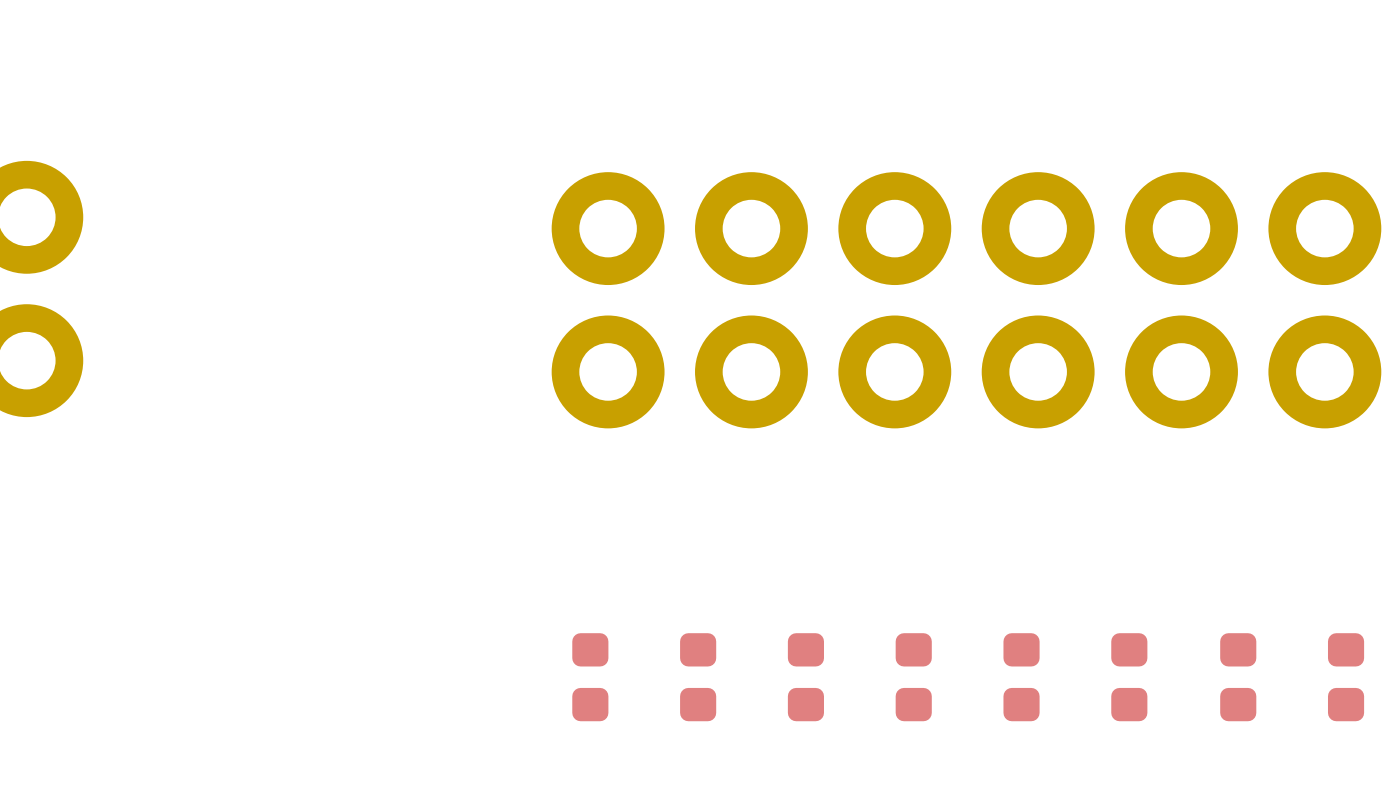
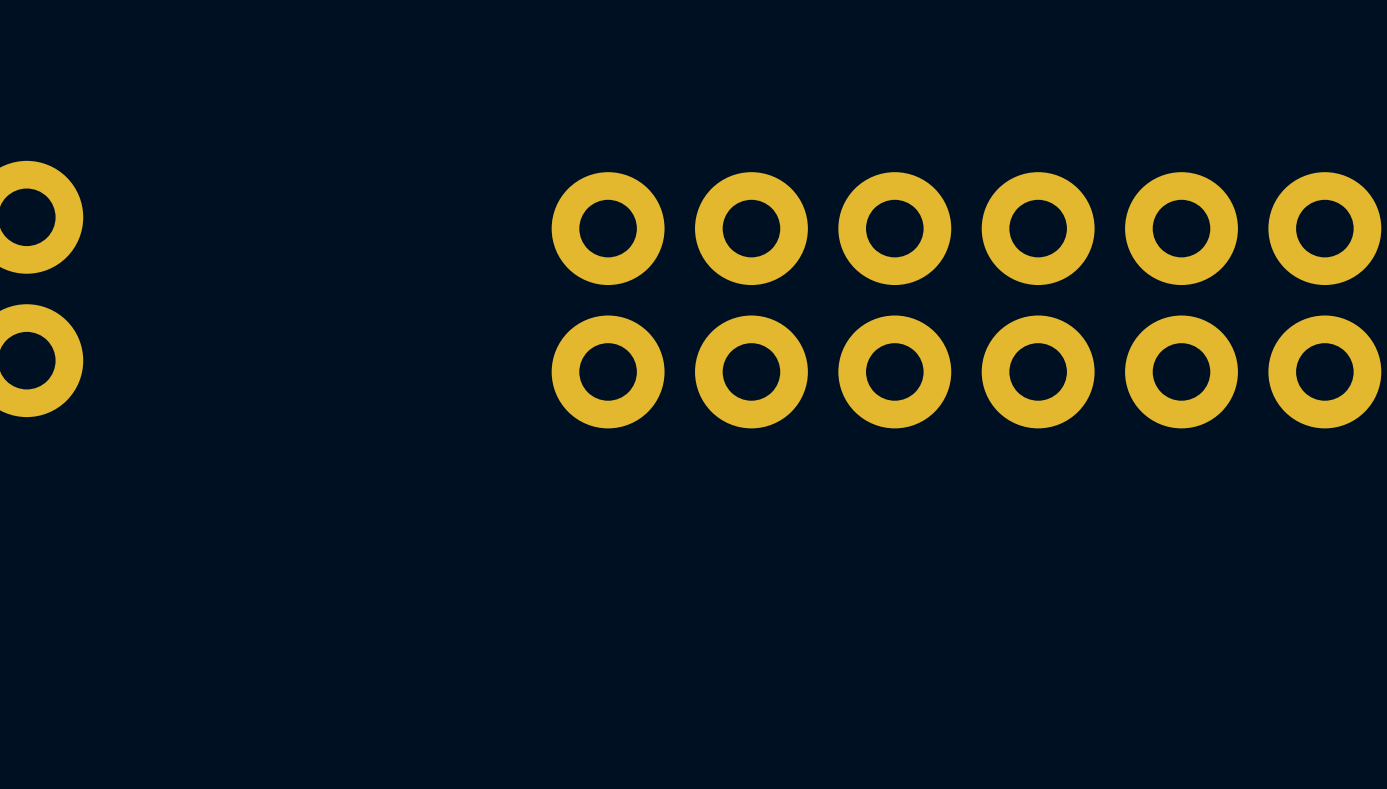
part: (590, 677) -> none
part: (698, 677) -> none
part: (805, 677) -> none
part: (913, 677) -> none
part: (1021, 677) -> none
part: (1129, 677) -> none
part: (1238, 677) -> none
part: (1346, 677) -> none

